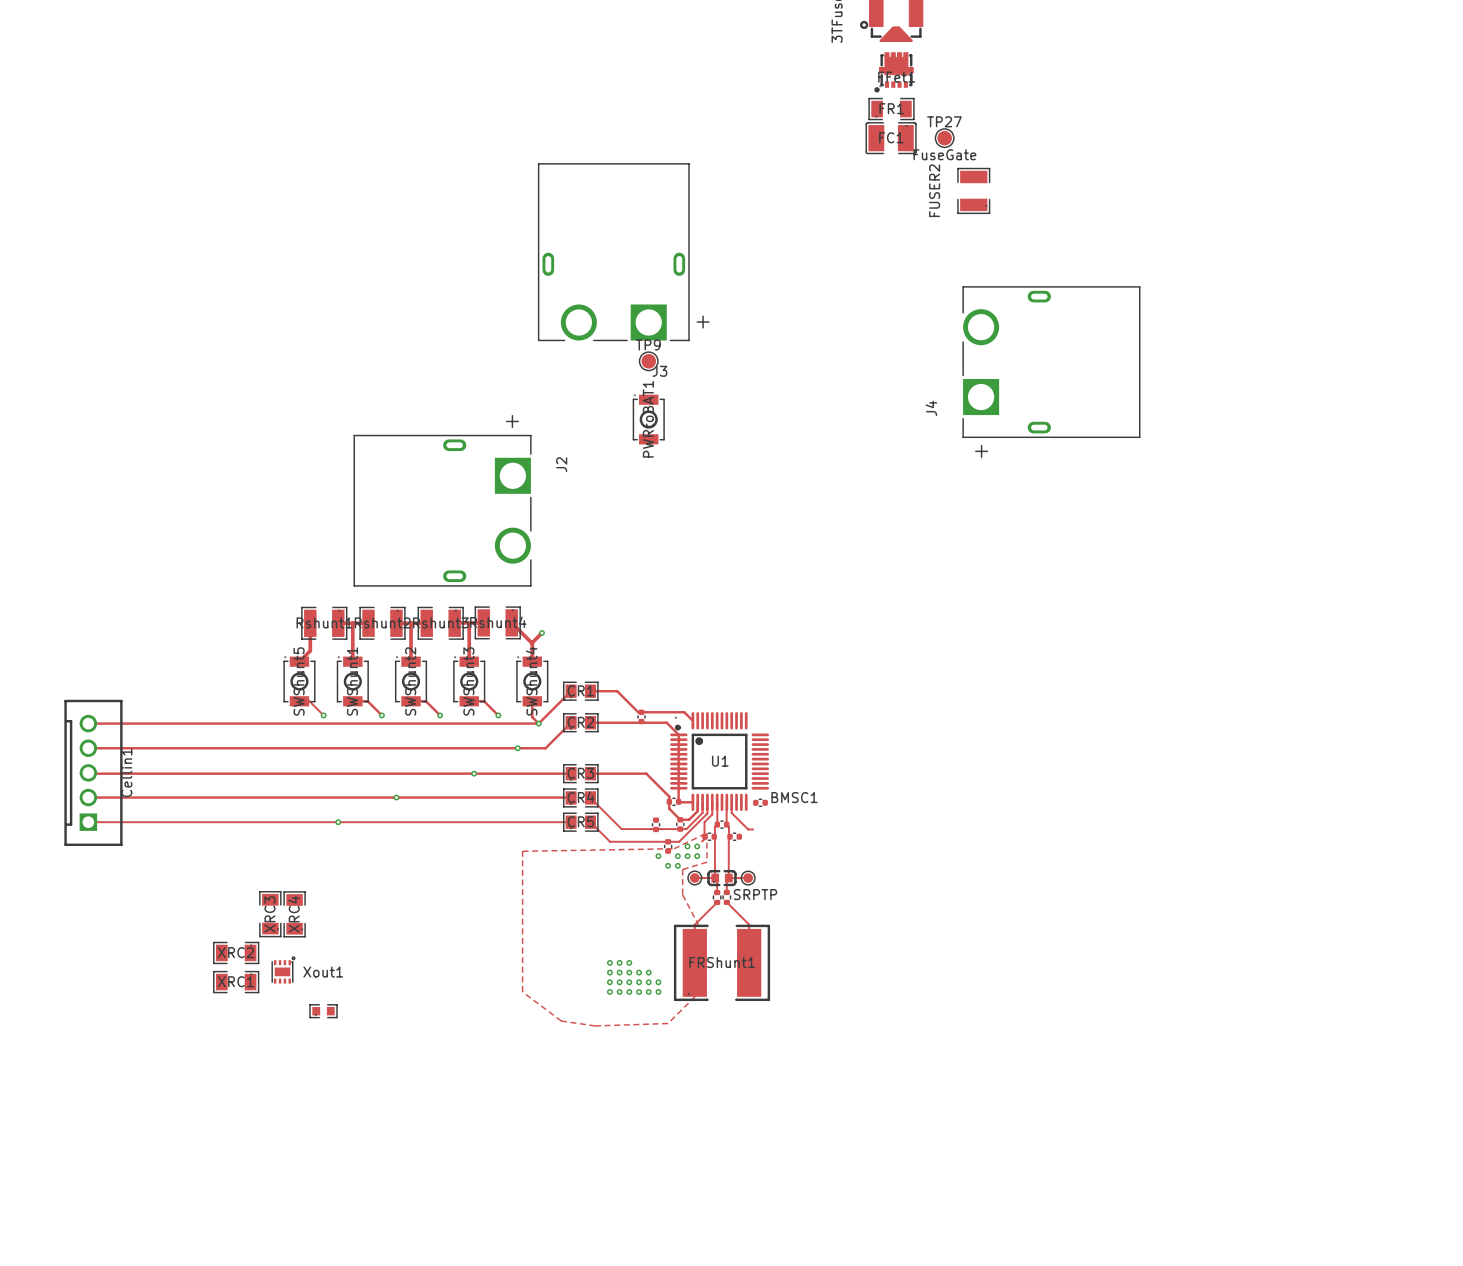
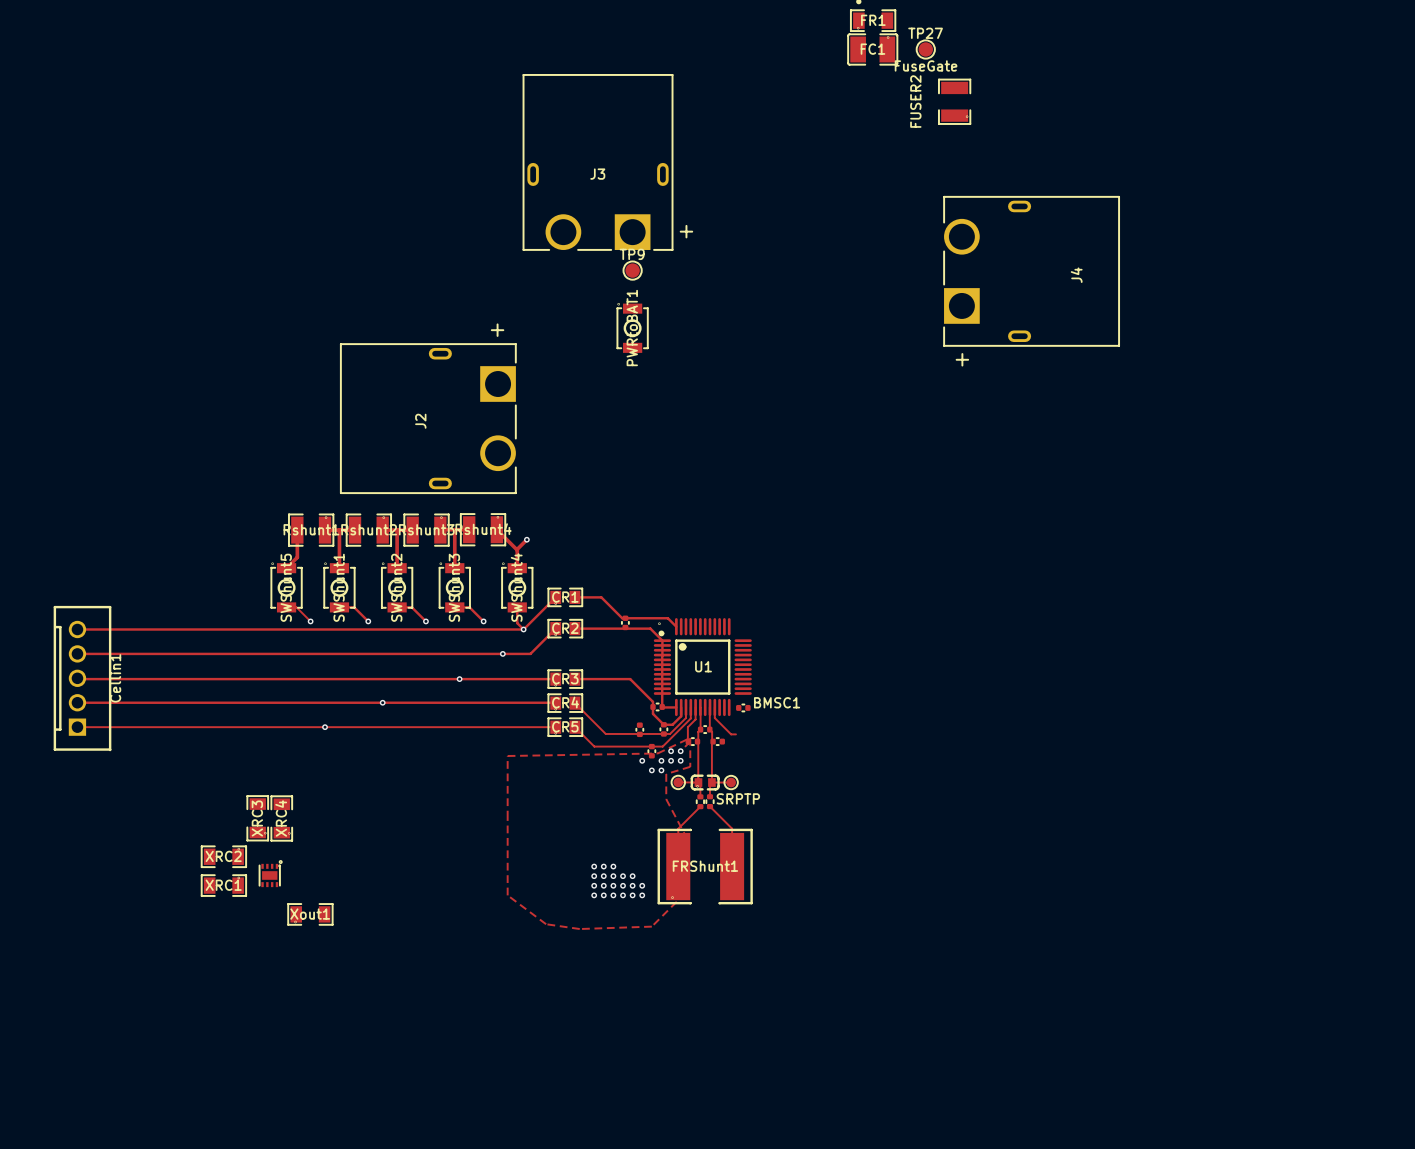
J3 name position: J3 (659, 371) -> J3 (597, 174)
J4 name position: J4 (931, 408) -> J4 (1076, 275)
J2 name position: J2 (561, 464) -> J2 (420, 421)
Xout1 name position: Xout1 (323, 972) -> Xout1 (310, 914)
Xout1 footprint: [309, 1004, 338, 1019] -> [287, 903, 334, 926]

